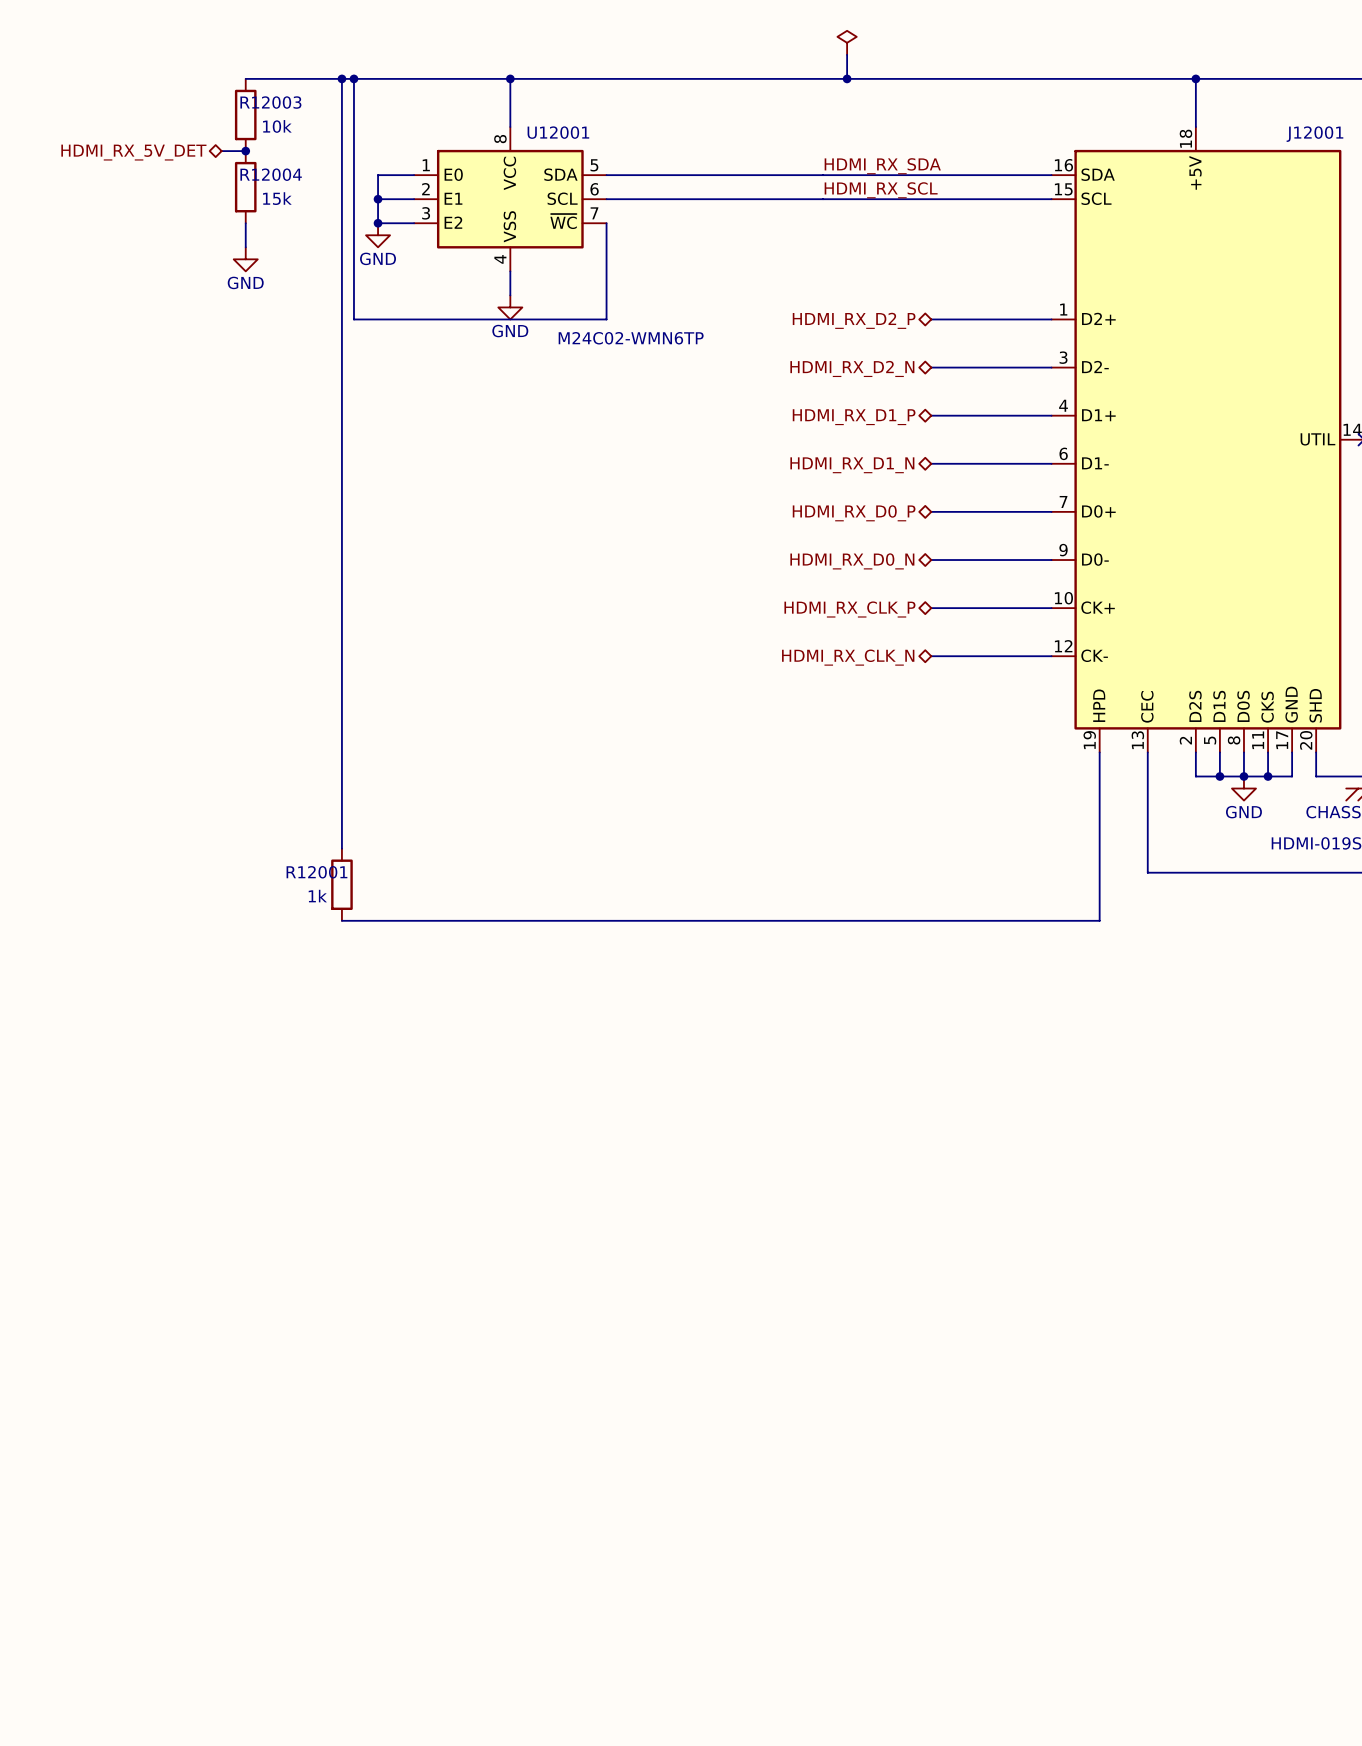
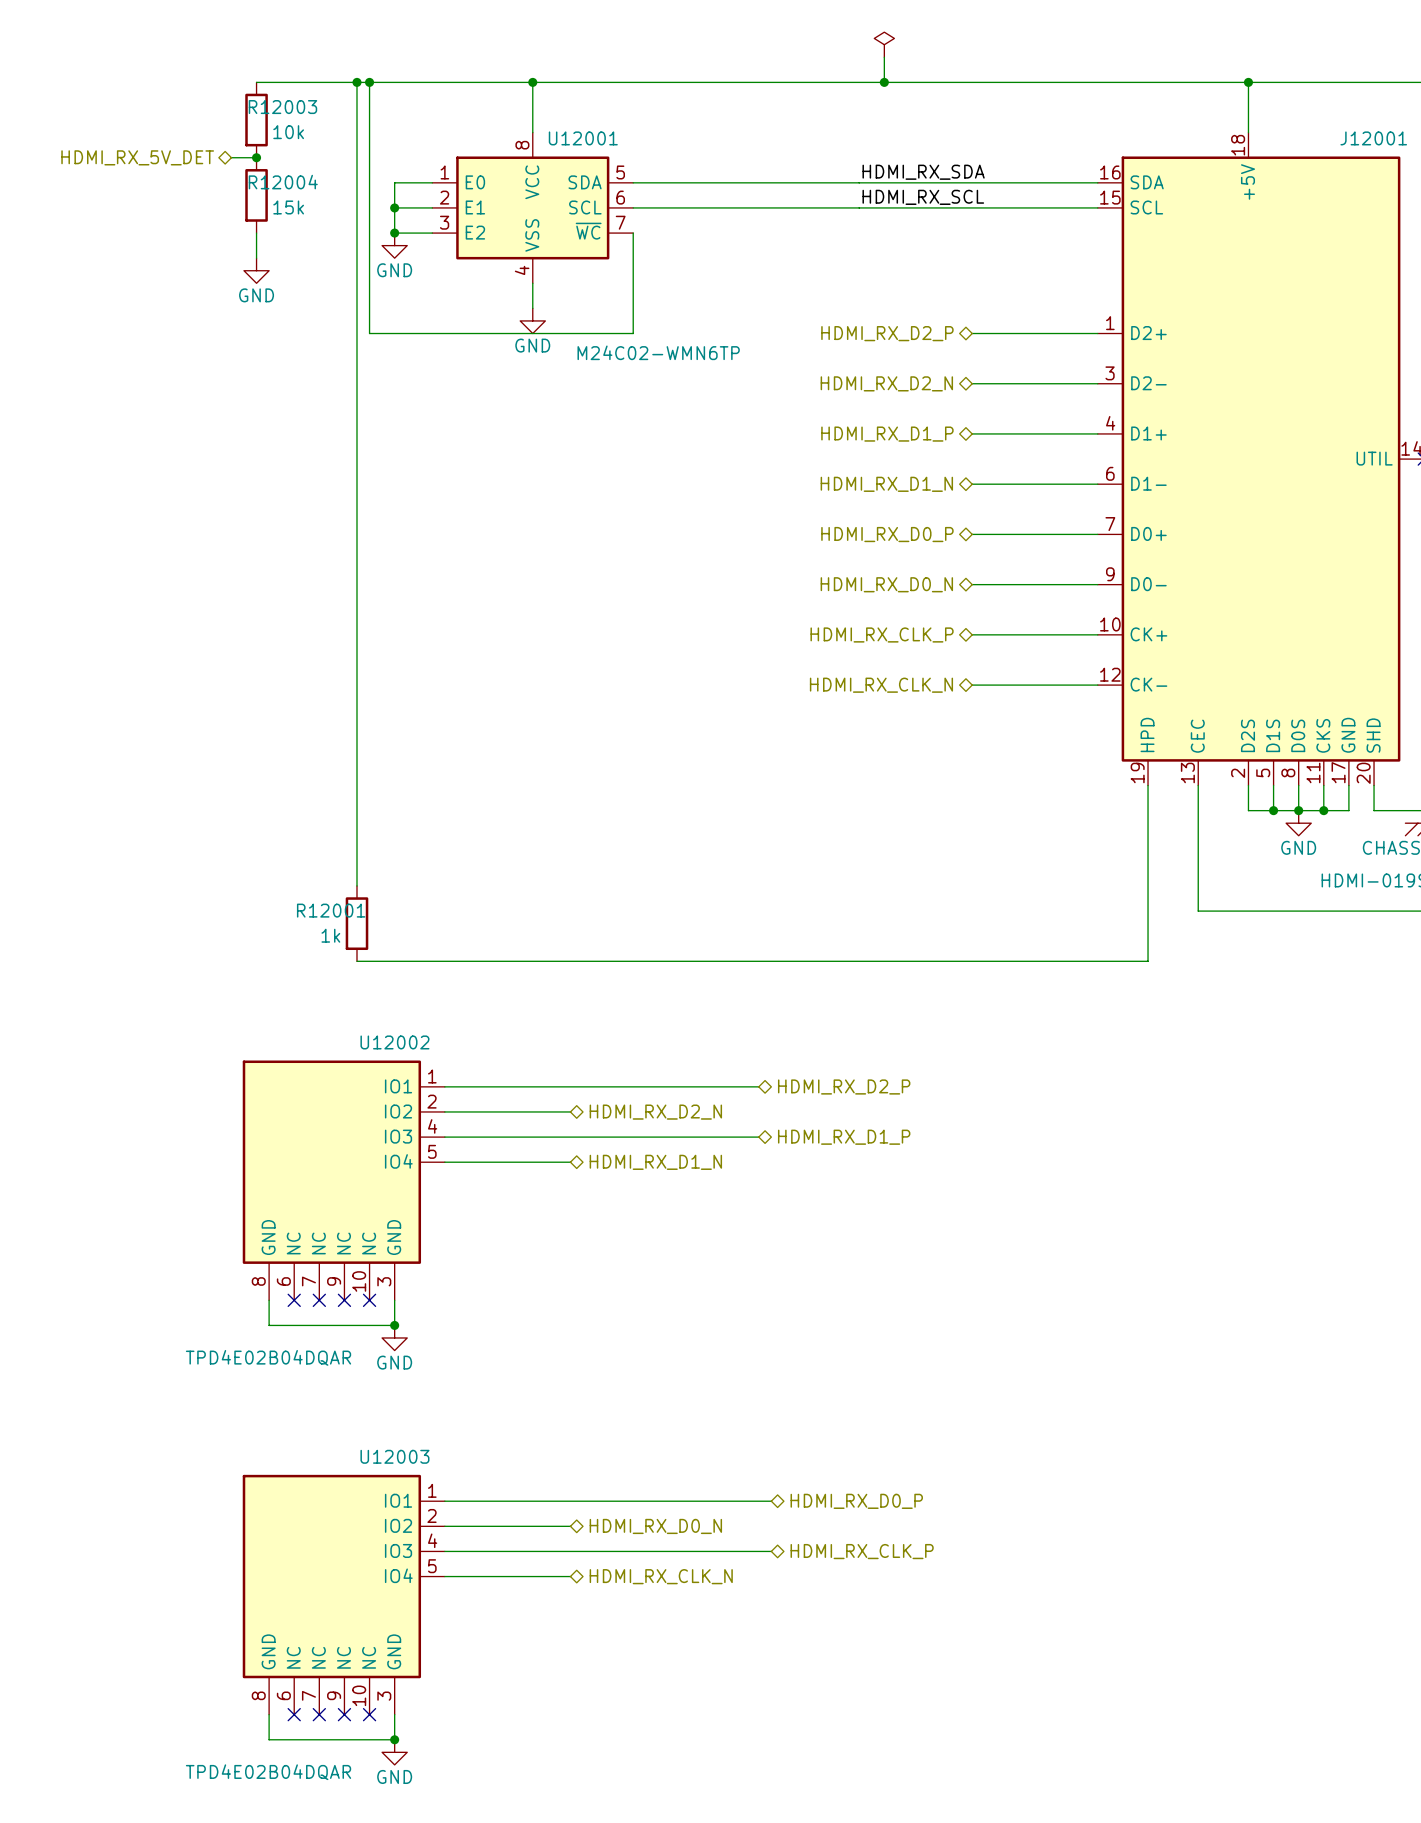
wire: none -> (444, 1086) (758, 1086)
hierarchical label: none -> HDMI_RX_D2_P (844, 1087)
wire: none -> (444, 1111) (570, 1111)
hierarchical label: none -> HDMI_RX_D2_N (655, 1112)
wire: none -> (444, 1137) (758, 1137)
hierarchical label: none -> HDMI_RX_D1_P (844, 1137)
wire: none -> (444, 1162) (570, 1162)
hierarchical label: none -> HDMI_RX_D1_N (655, 1162)
U12002: none -> TPD4E02B04DQAR (343, 1180)
wire: none -> (269, 1300) (269, 1325) (394, 1325) (394, 1300)
no-connect mark: none -> (294, 1300)
no-connect mark: none -> (319, 1300)
no-connect mark: none -> (344, 1300)
no-connect mark: none -> (369, 1300)
junction: none -> (394, 1325)
power symbol: none -> GND (394, 1337)
wire: none -> (444, 1501) (771, 1501)
hierarchical label: none -> HDMI_RX_D0_P (856, 1501)
wire: none -> (444, 1526) (570, 1526)
hierarchical label: none -> HDMI_RX_D0_N (655, 1526)
wire: none -> (444, 1551) (771, 1551)
hierarchical label: none -> HDMI_RX_CLK_P (862, 1551)
wire: none -> (444, 1576) (570, 1576)
hierarchical label: none -> HDMI_RX_CLK_N (661, 1576)
U12003: none -> TPD4E02B04DQAR (343, 1594)
wire: none -> (269, 1714) (269, 1739) (394, 1739) (394, 1714)
no-connect mark: none -> (294, 1714)
no-connect mark: none -> (319, 1714)
no-connect mark: none -> (344, 1714)
no-connect mark: none -> (369, 1714)
junction: none -> (394, 1739)
power symbol: none -> GND (394, 1752)

